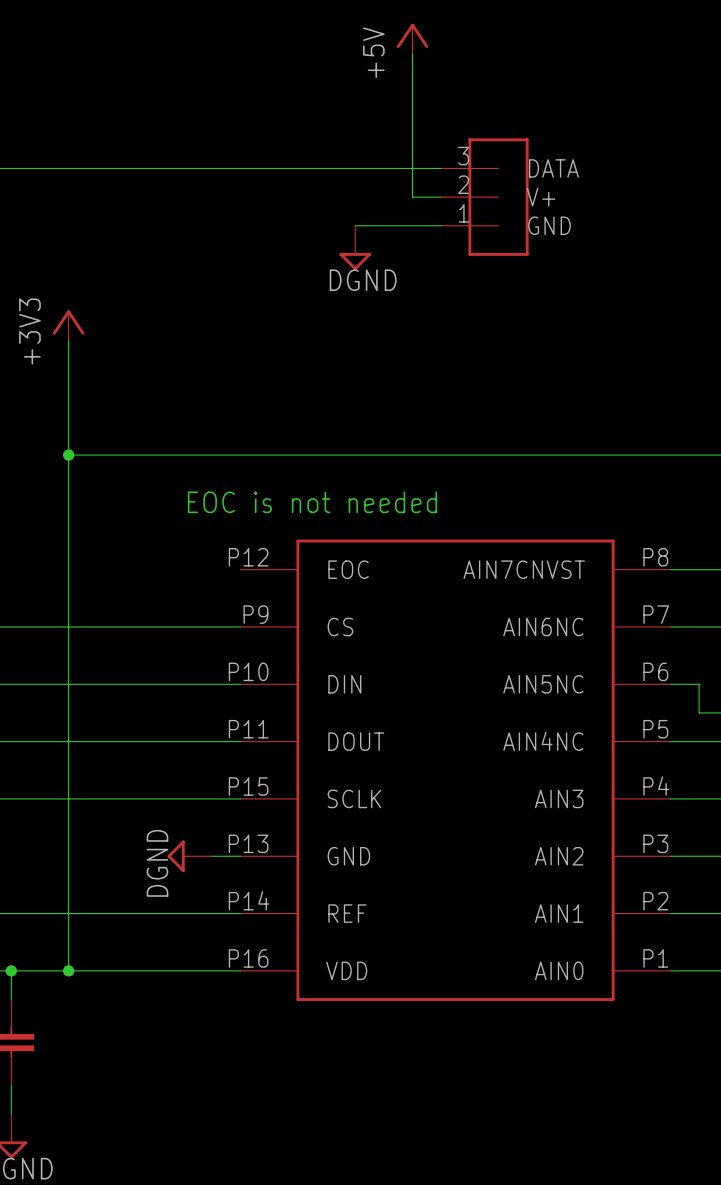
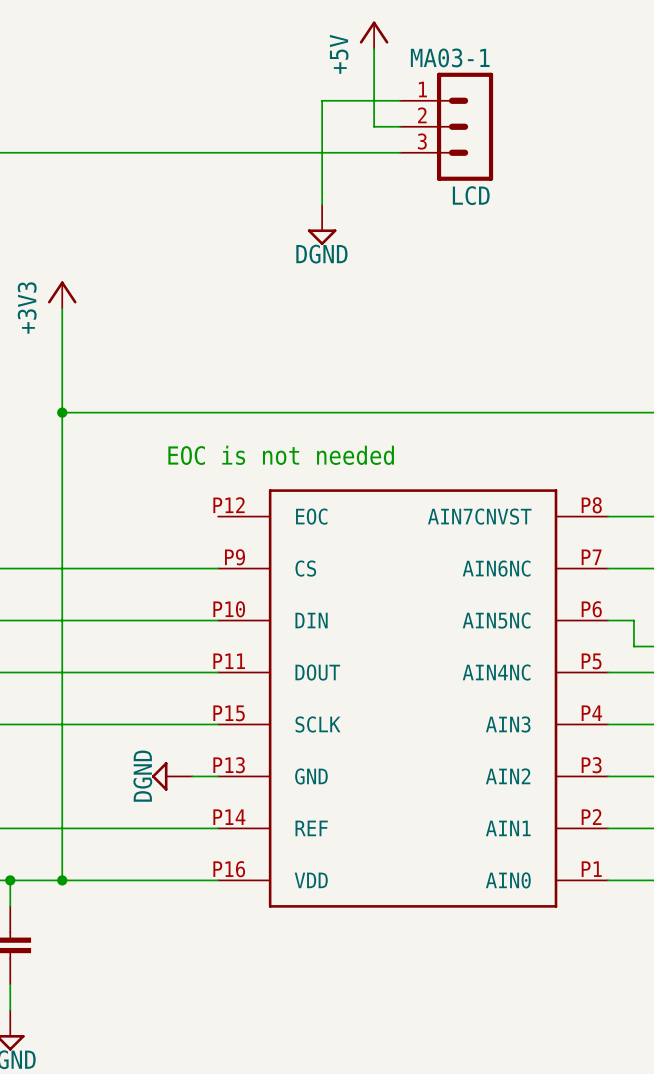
wire: (412, 139) (412, 197) (441, 197) -> (374, 126) (400, 126)
LCD: none -> MA03-1 (446, 126)
part: (484, 197) -> none
wire: (355, 225) (441, 225) -> (322, 204) (322, 100) (400, 100)

